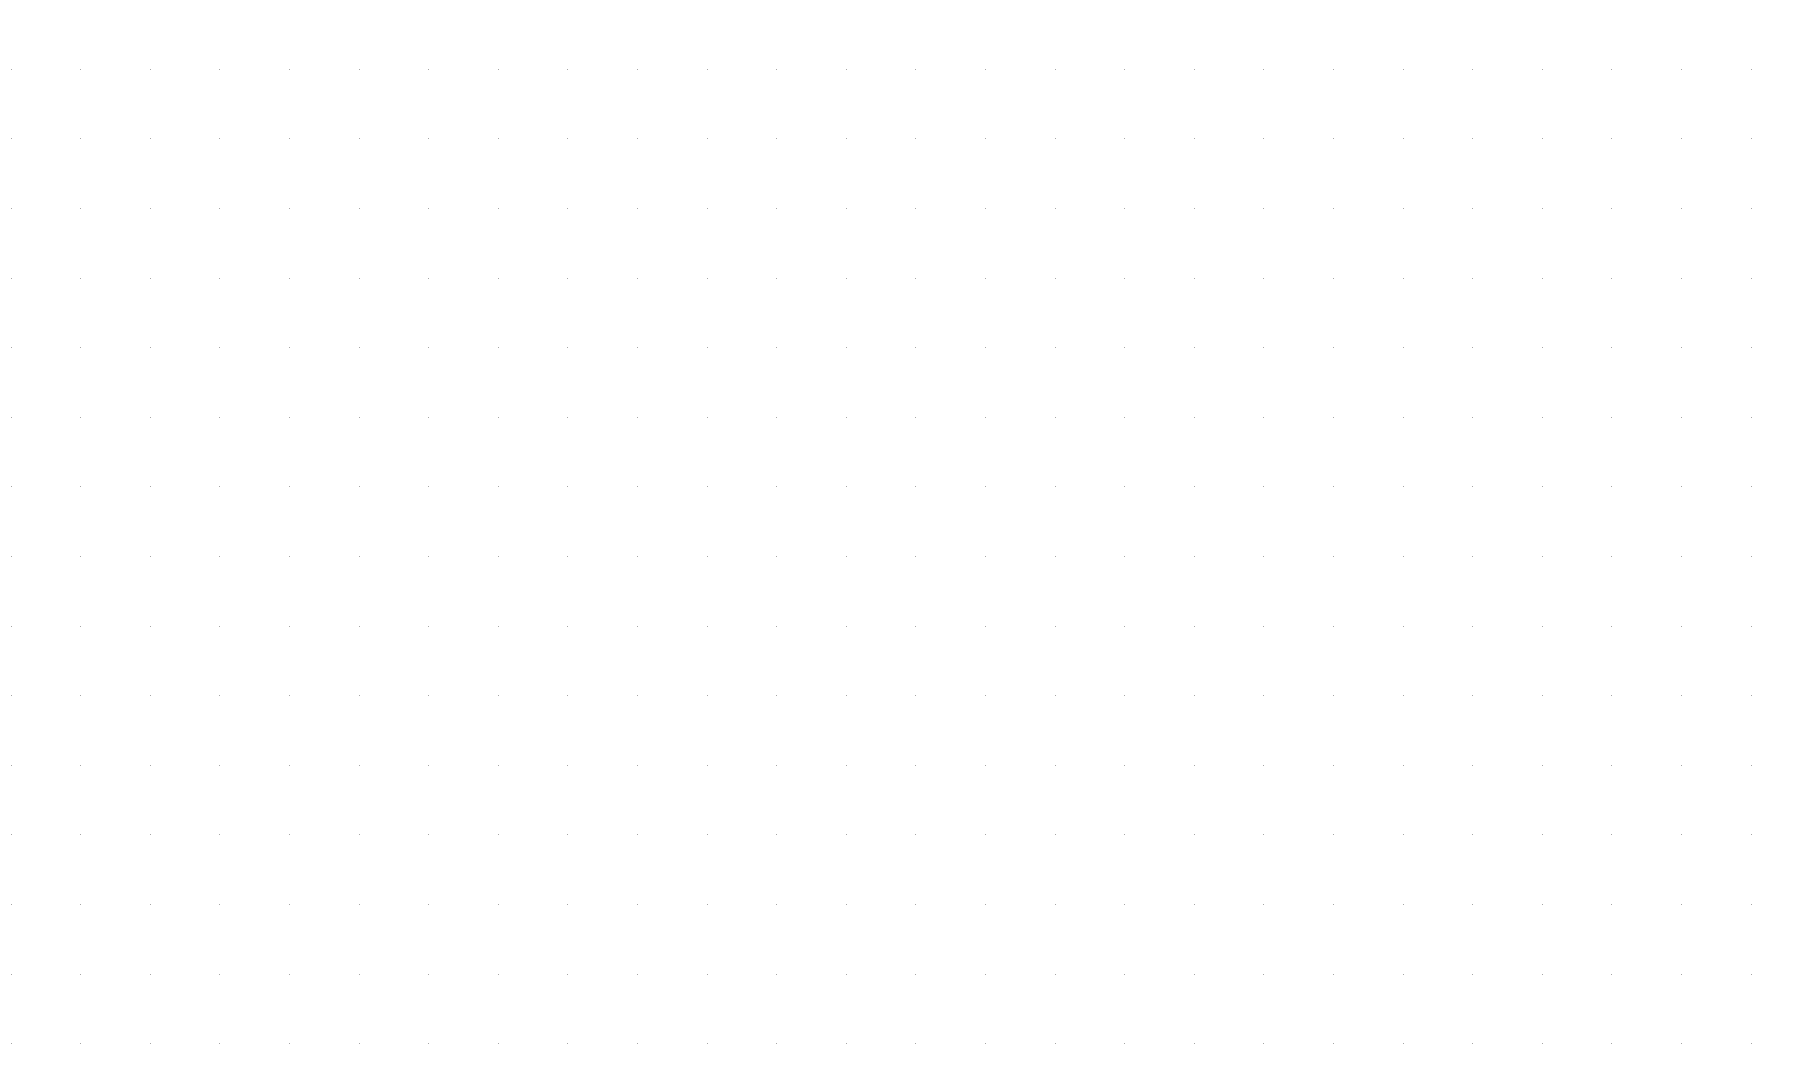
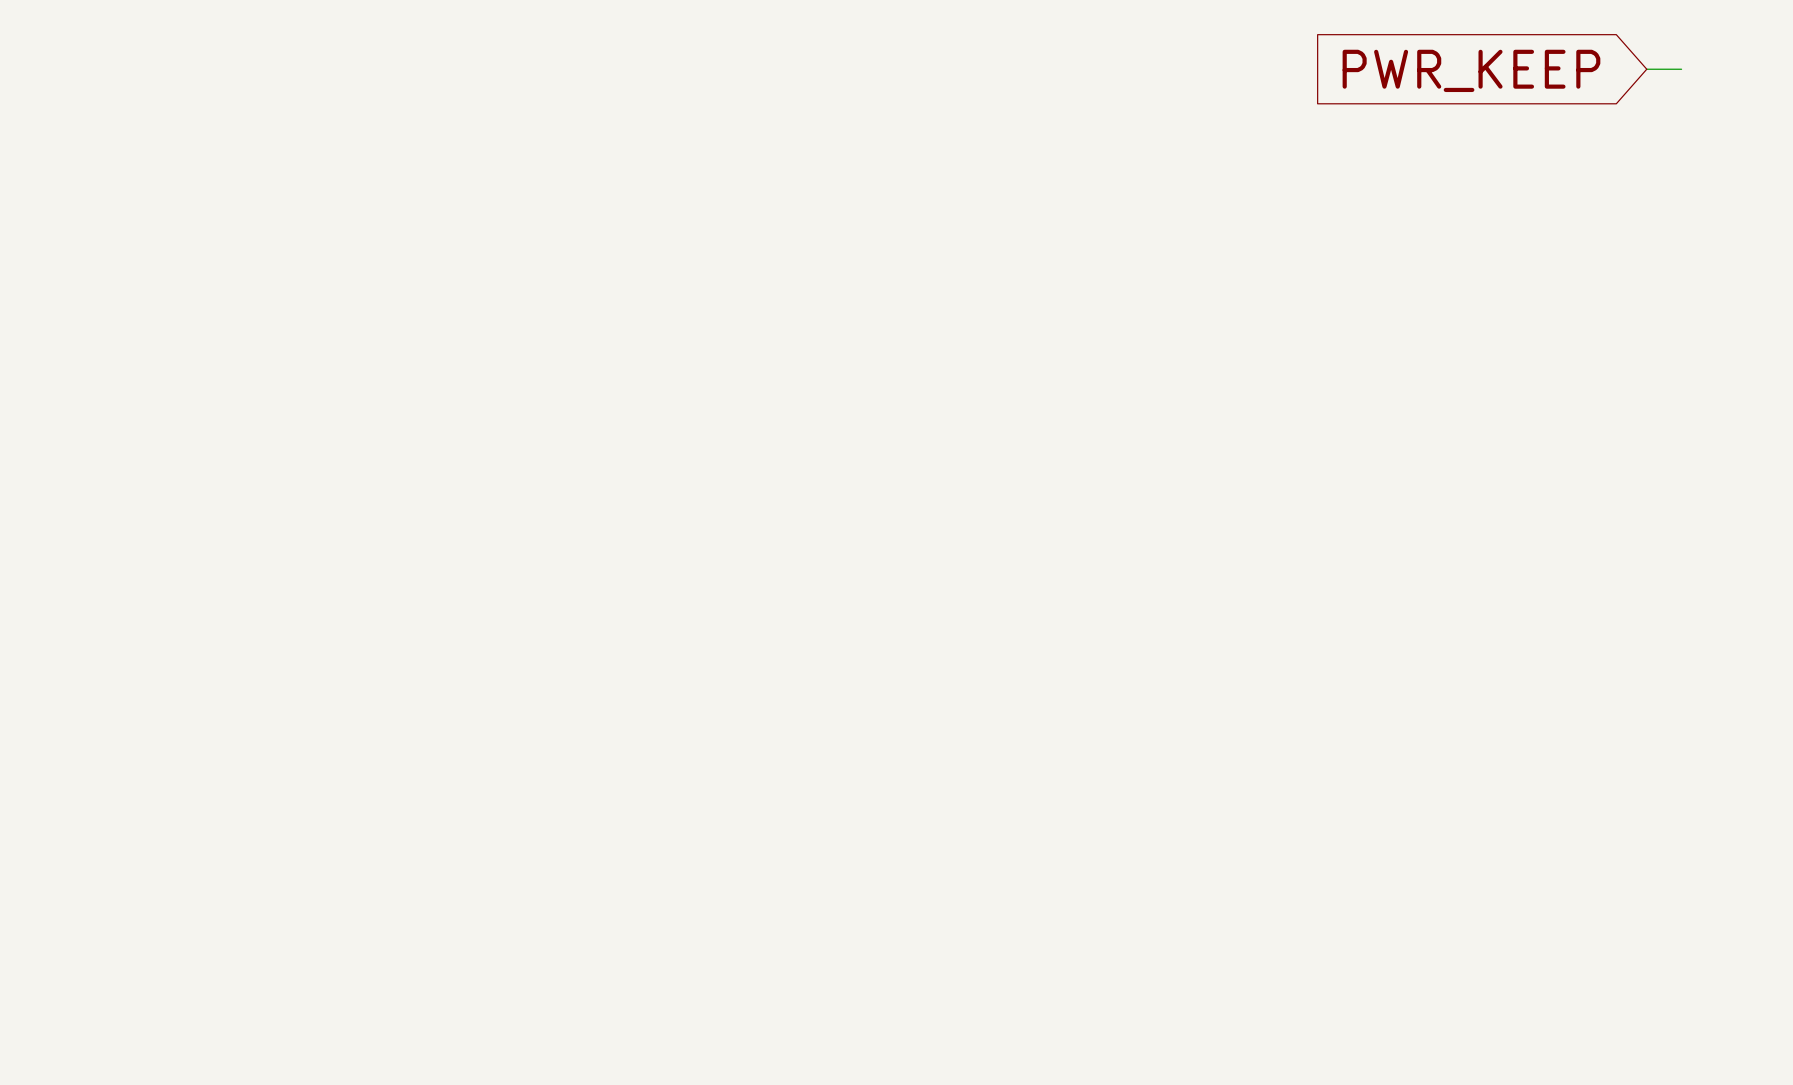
wire: none -> (1646, 69) (1681, 69)
global label: none -> PWR_KEEP (1471, 70)

